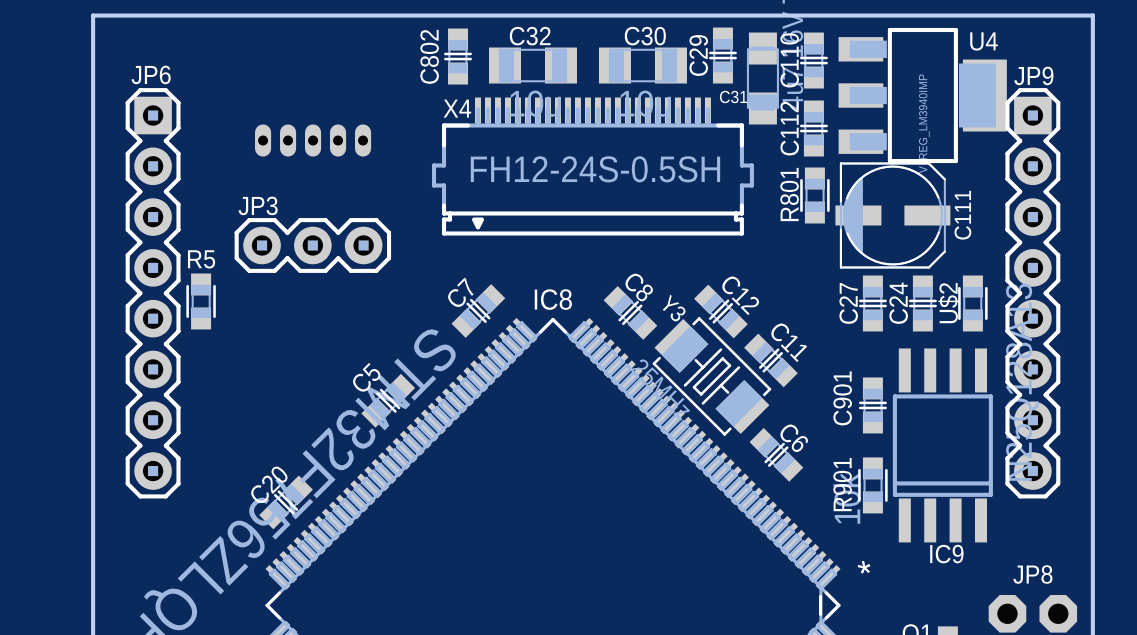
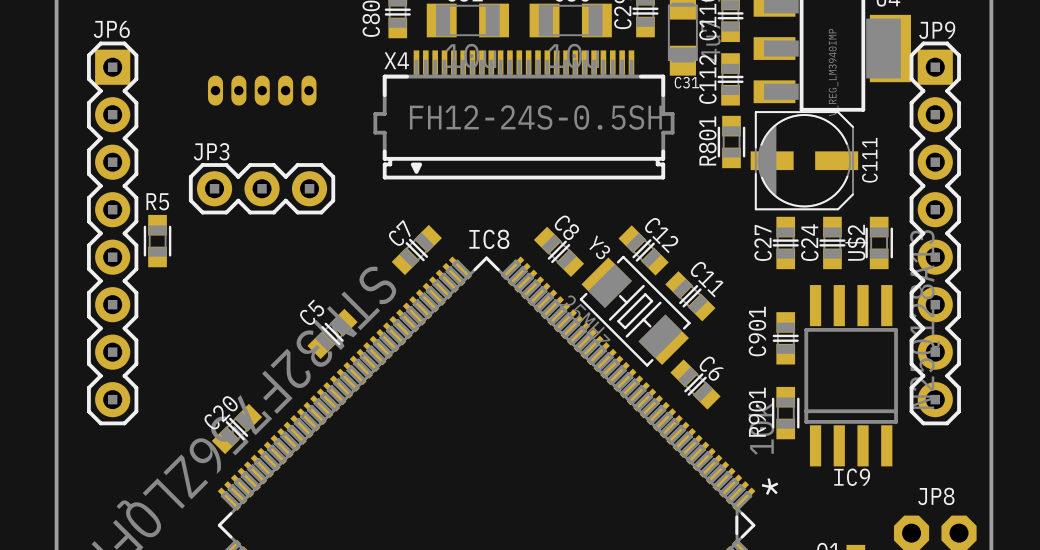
C31 name position: C31 (733, 97) -> C31 (686, 82)

